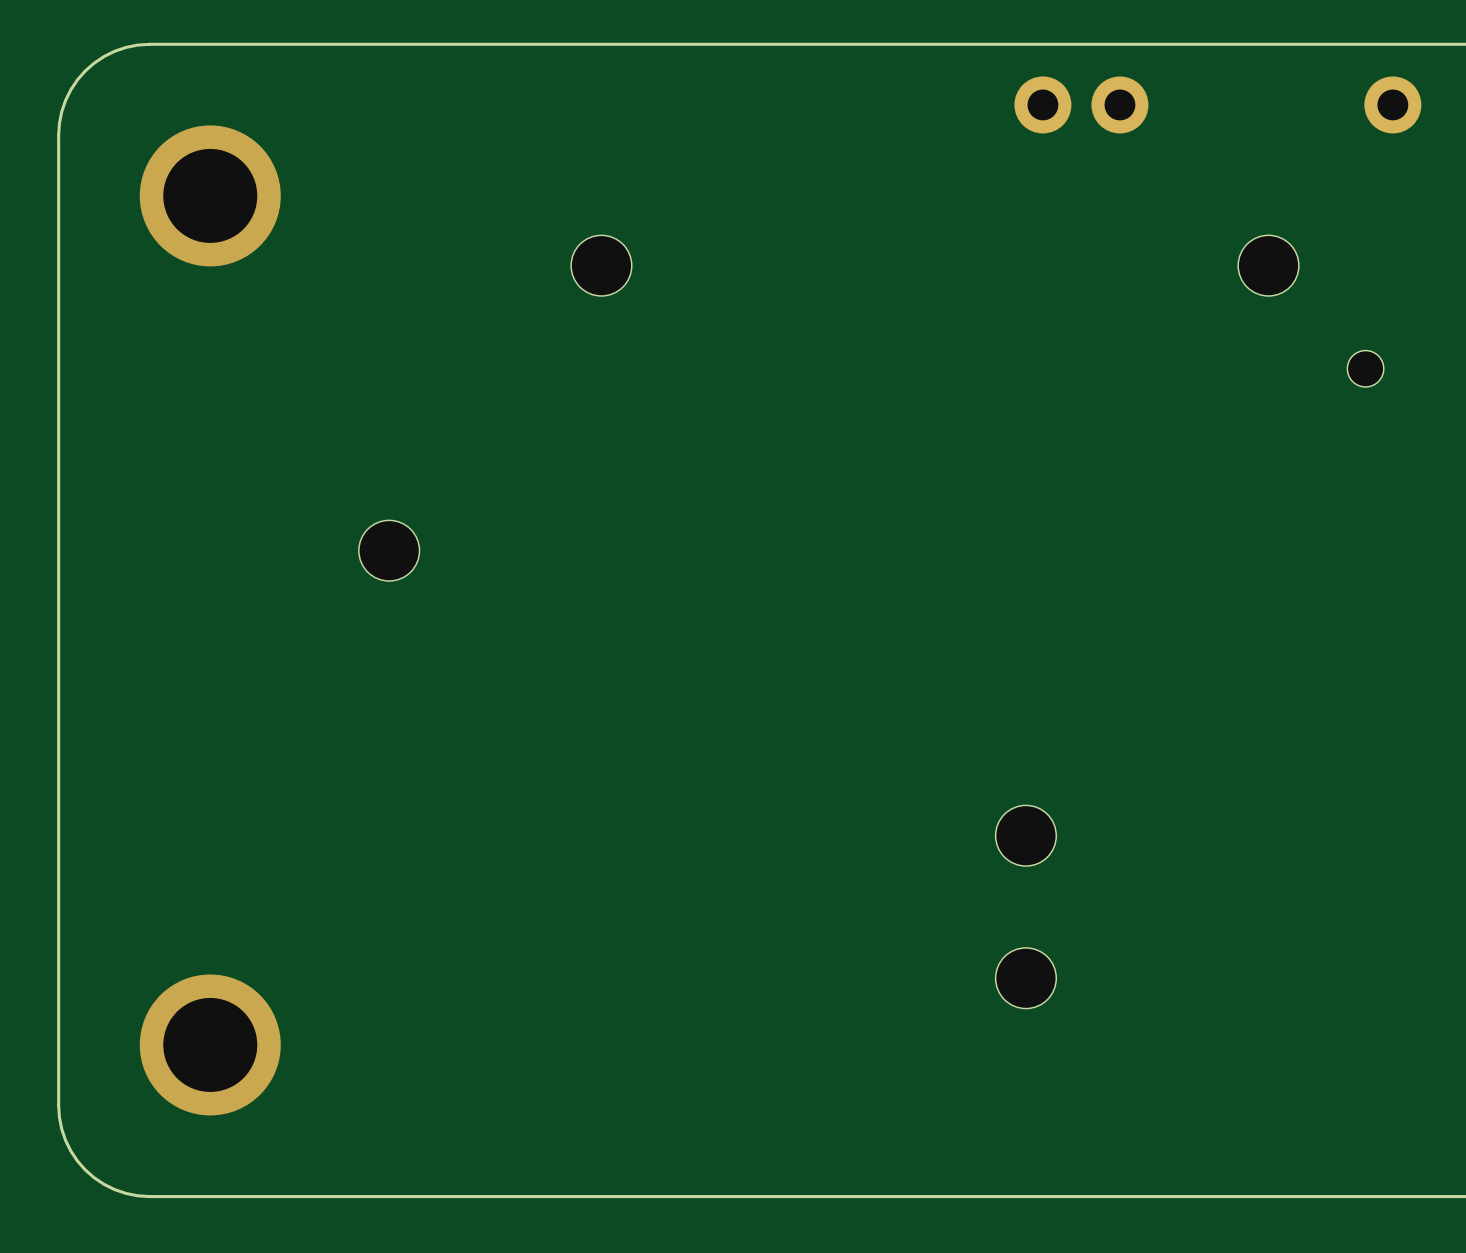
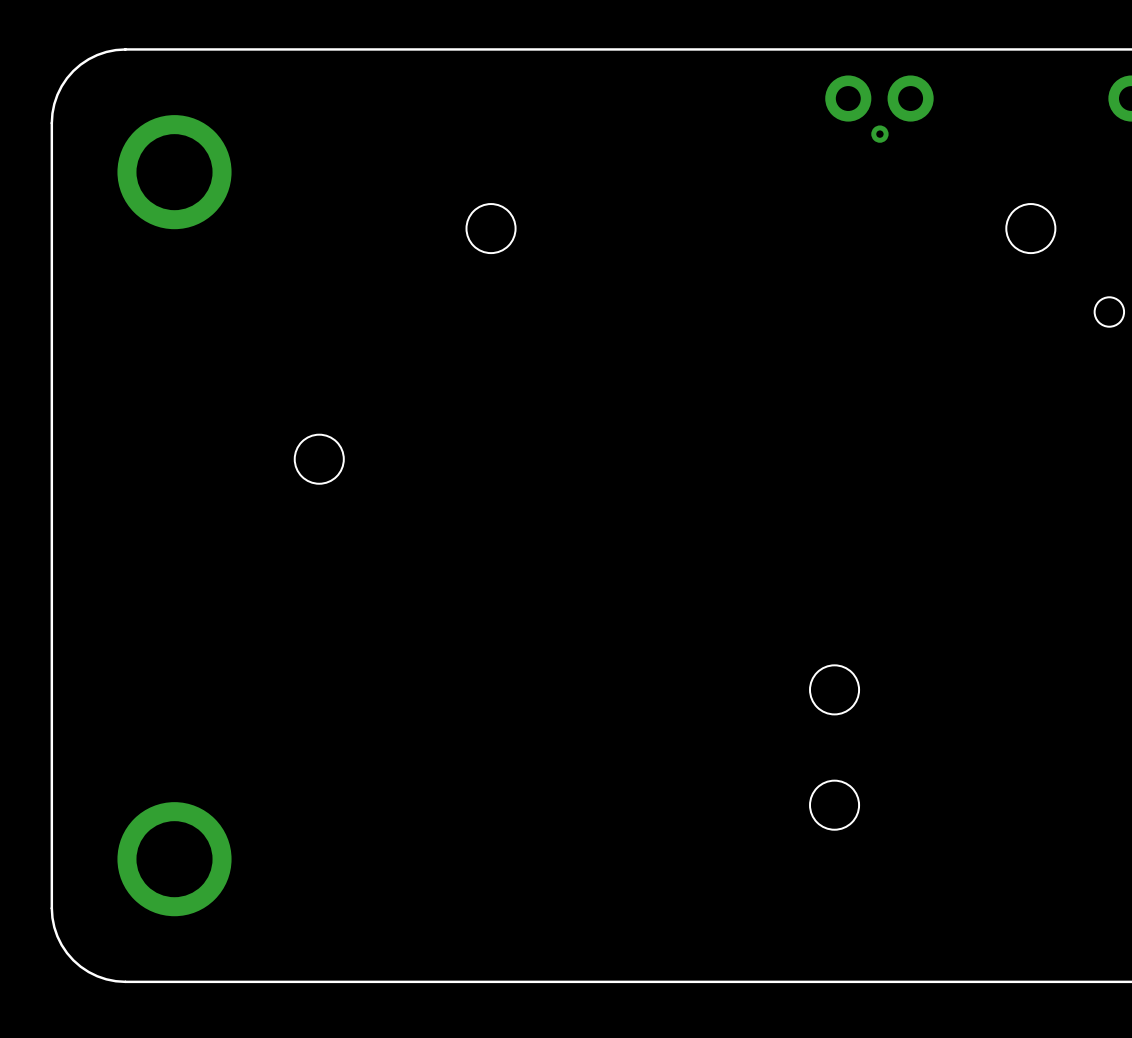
via: none -> (879, 134)

